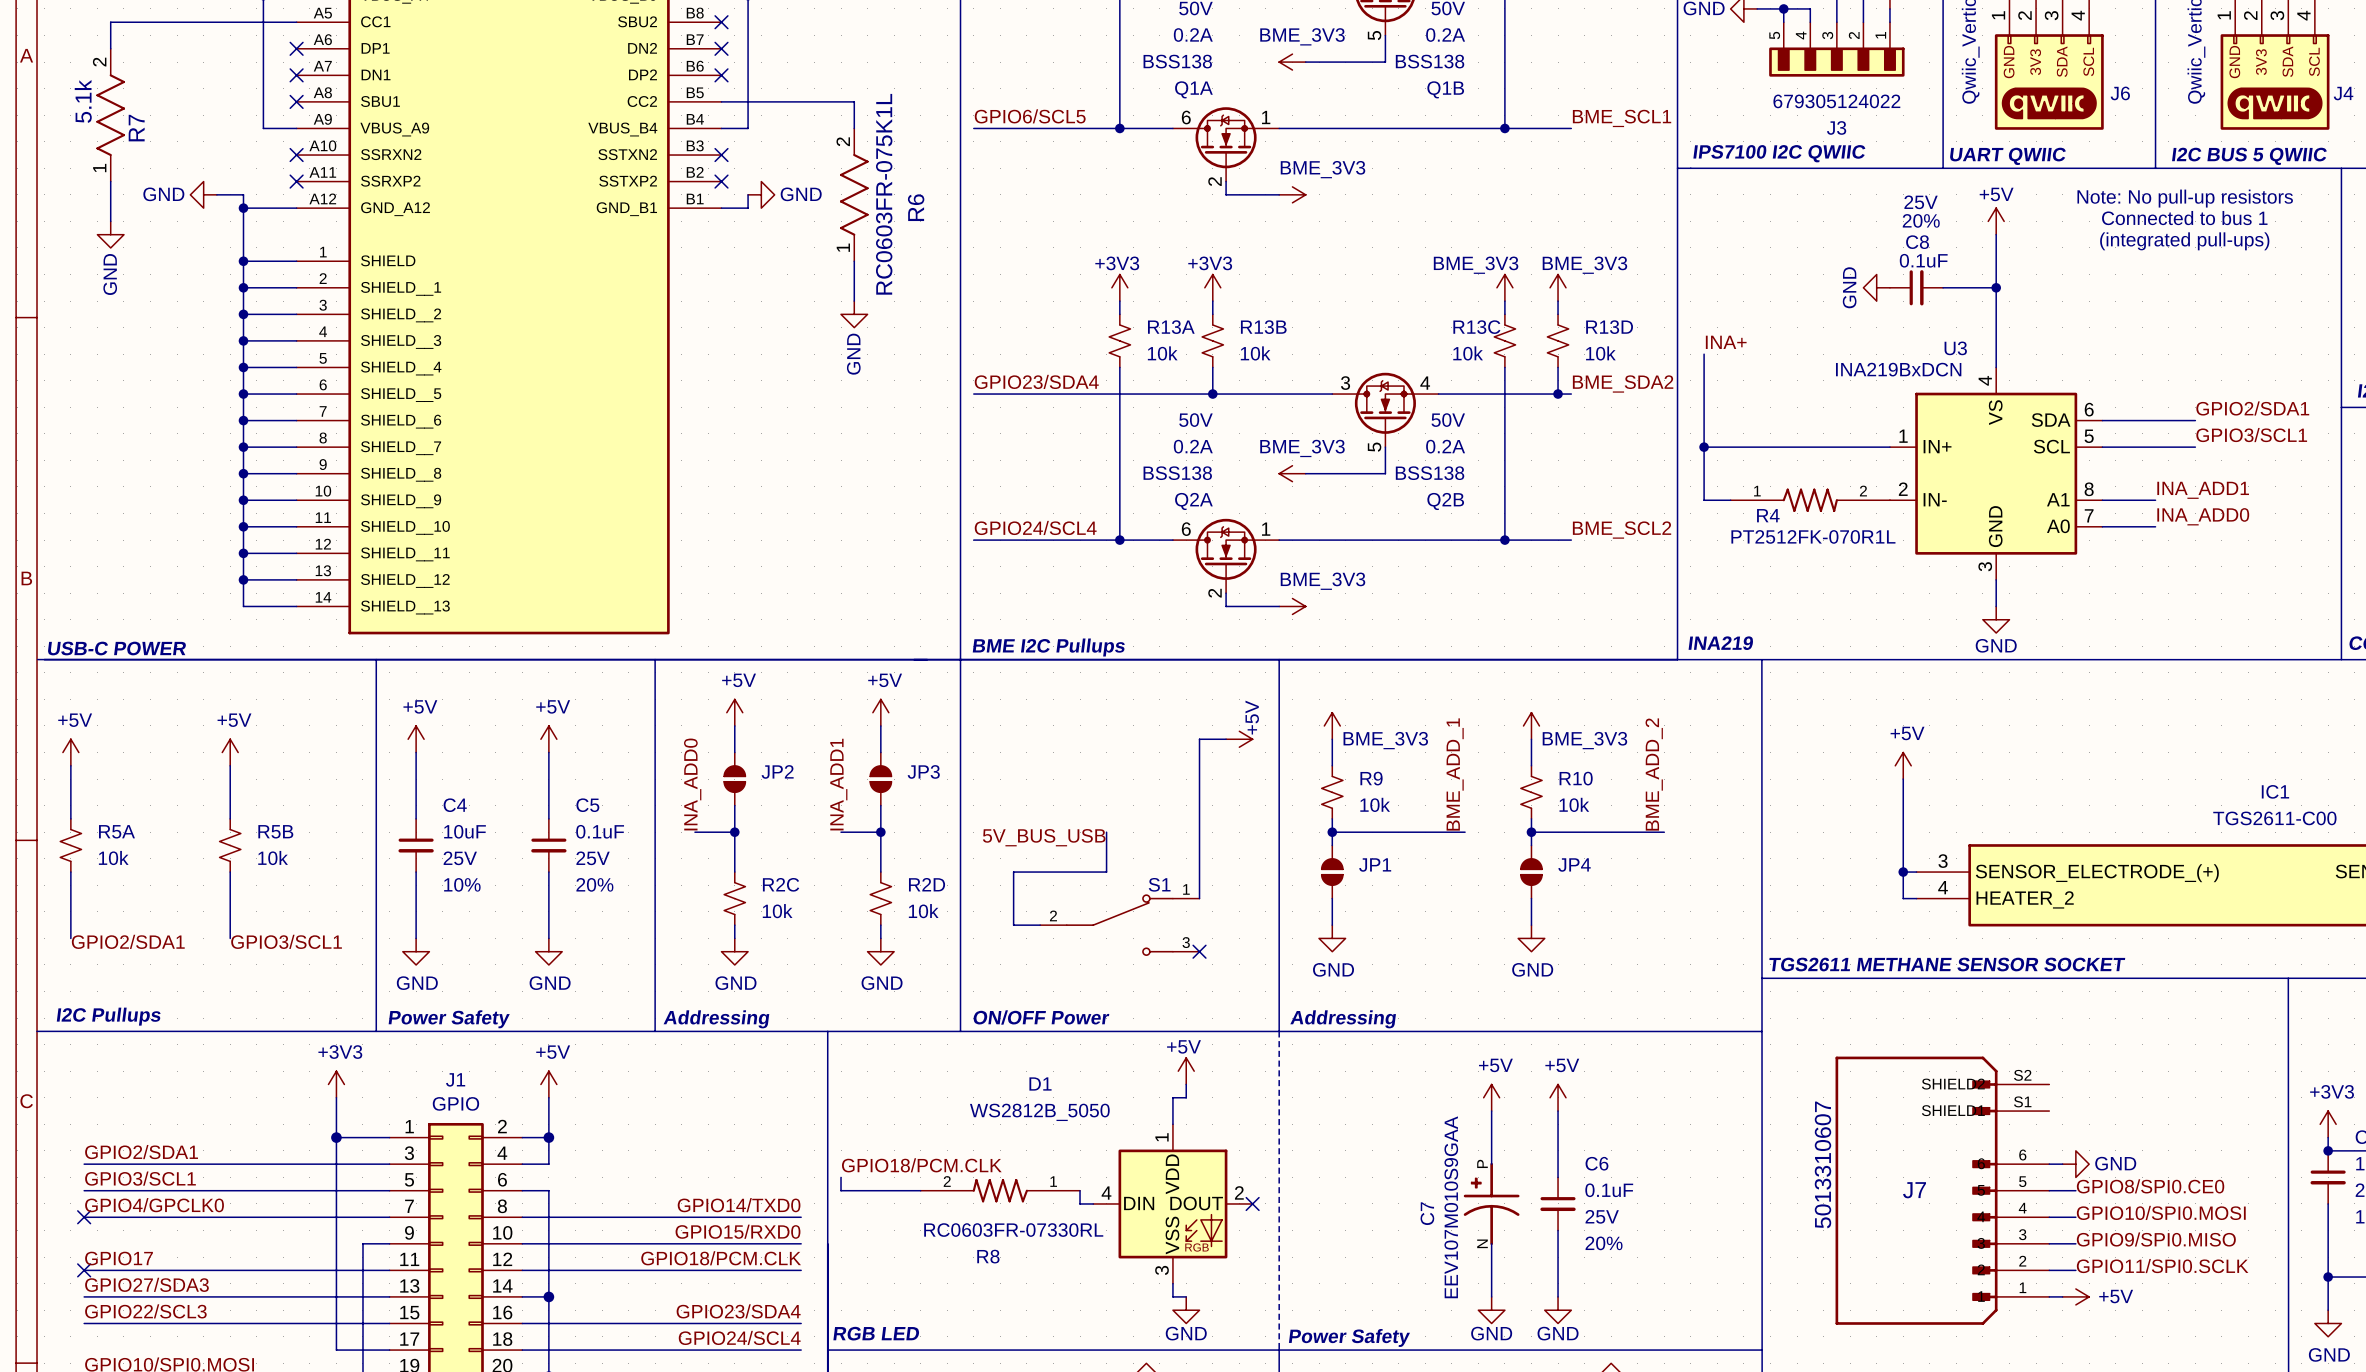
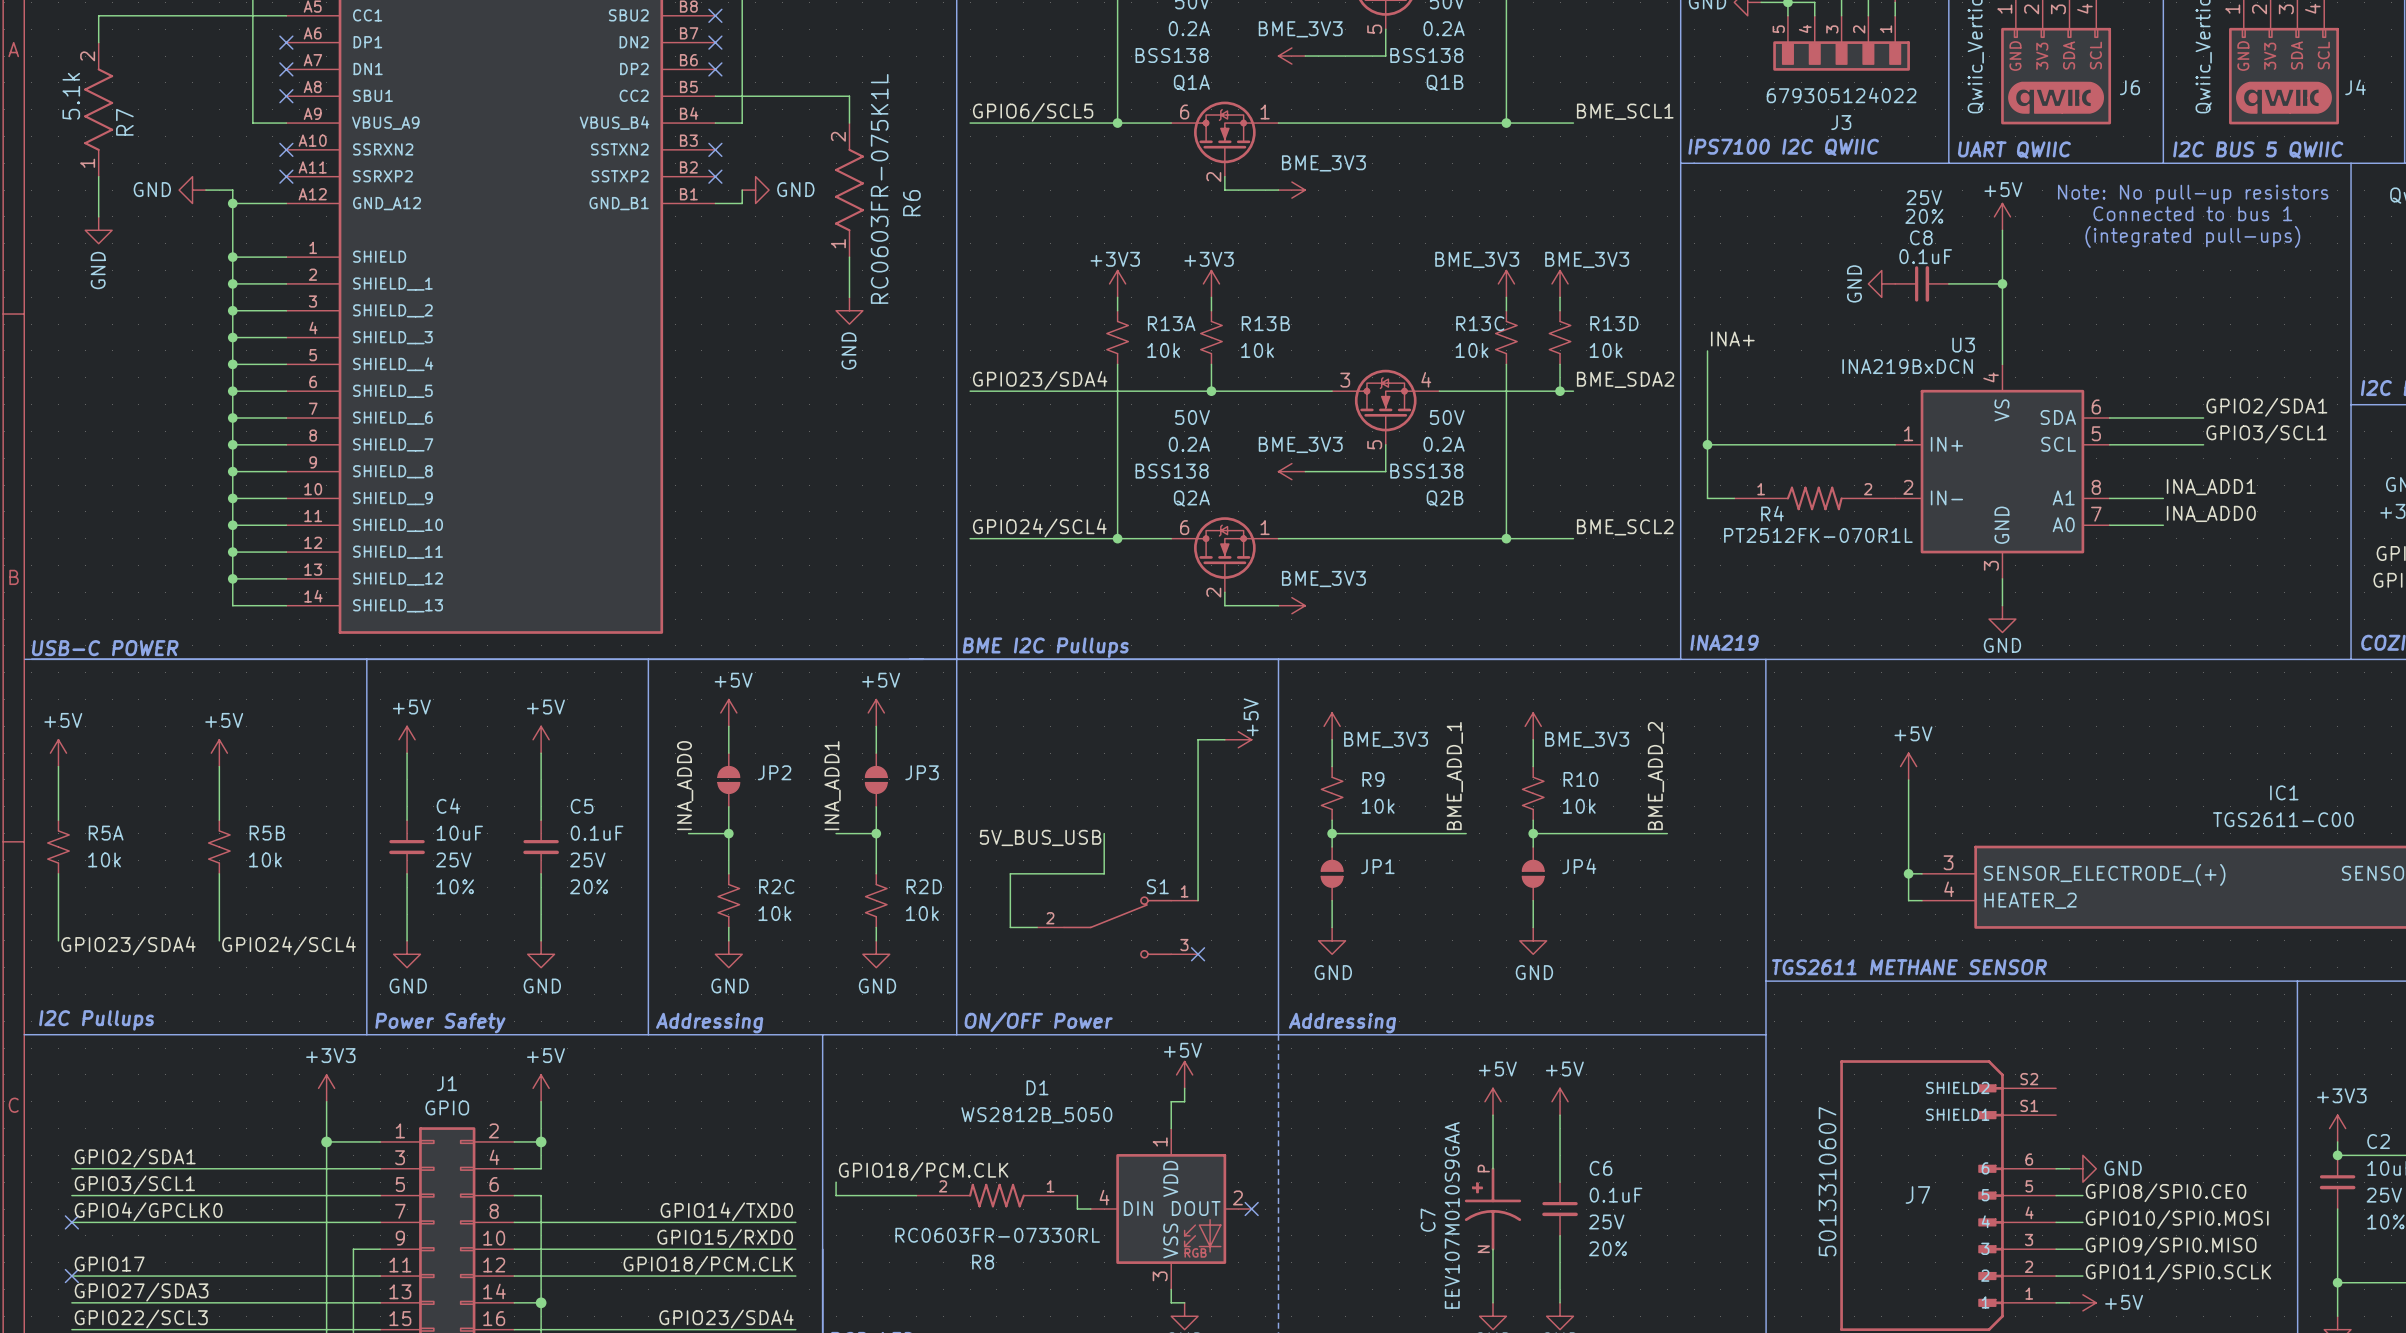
label: GPIO2/SDA1 (128, 941) -> GPIO23/SDA4 (128, 945)
label: GPIO3/SCL1 (286, 941) -> GPIO24/SCL4 (289, 945)
text: TGS2611 METHANE SENSOR SOCKET (1947, 964) -> TGS2611 METHANE SENSOR (1909, 967)

